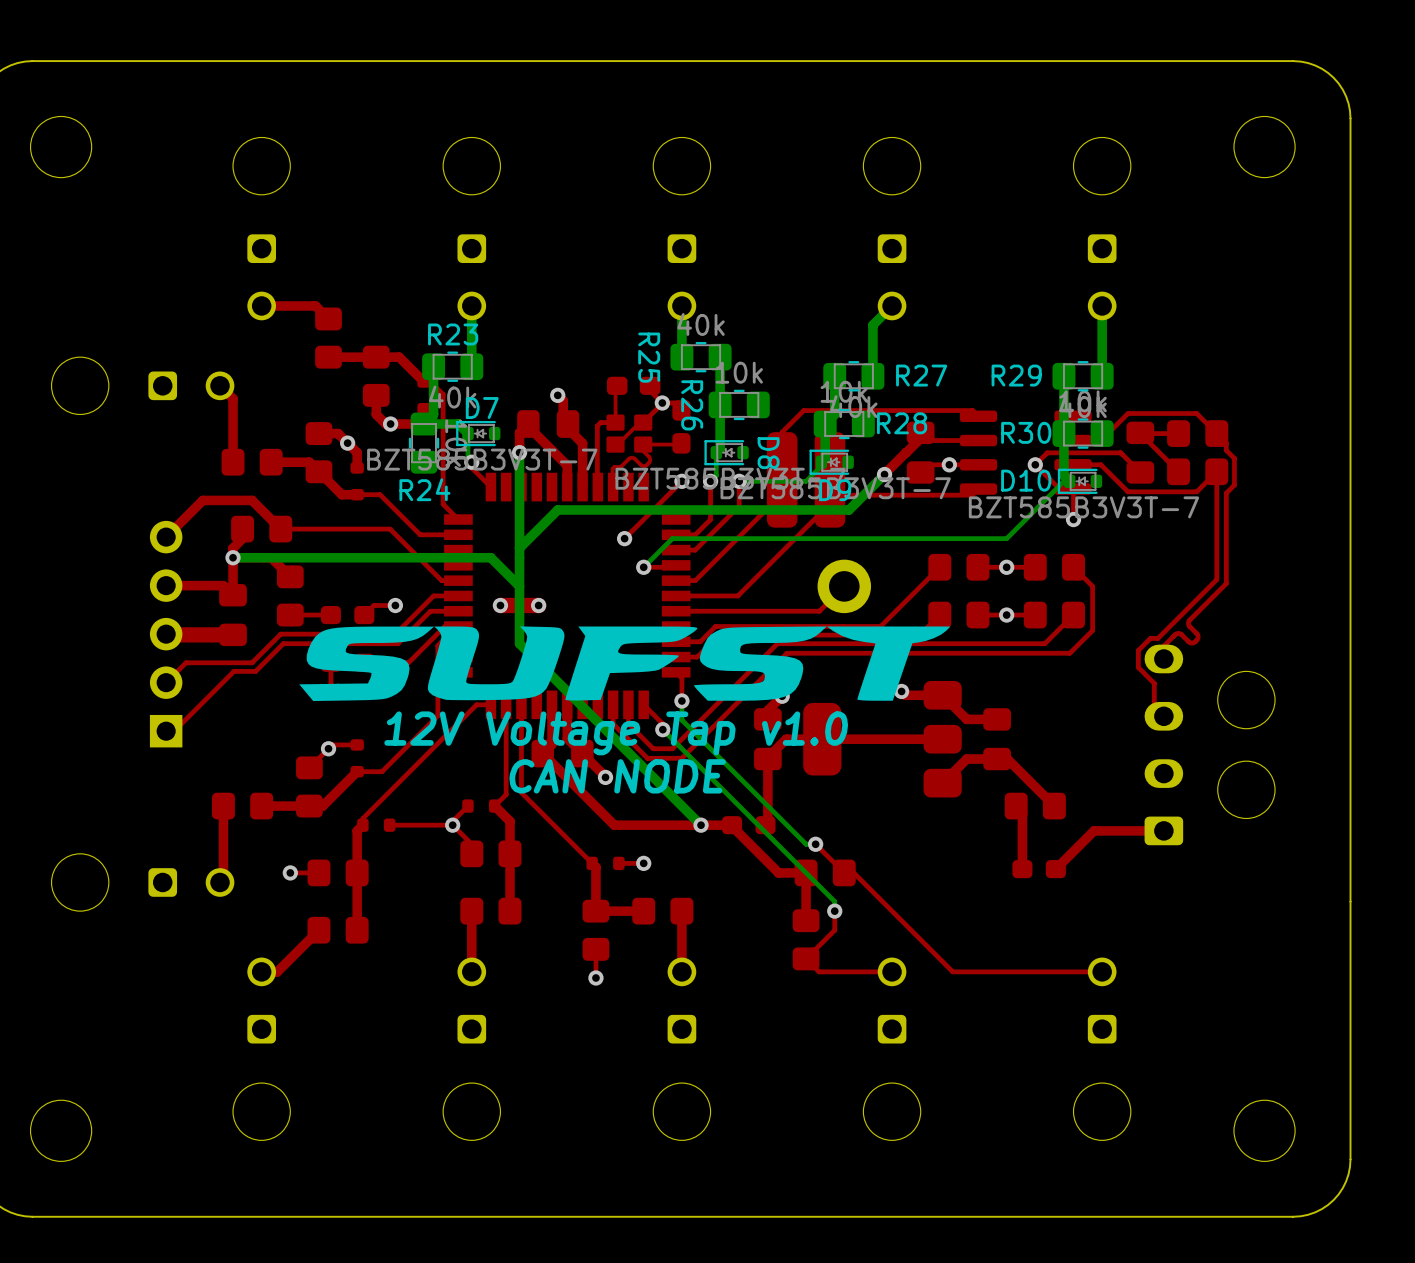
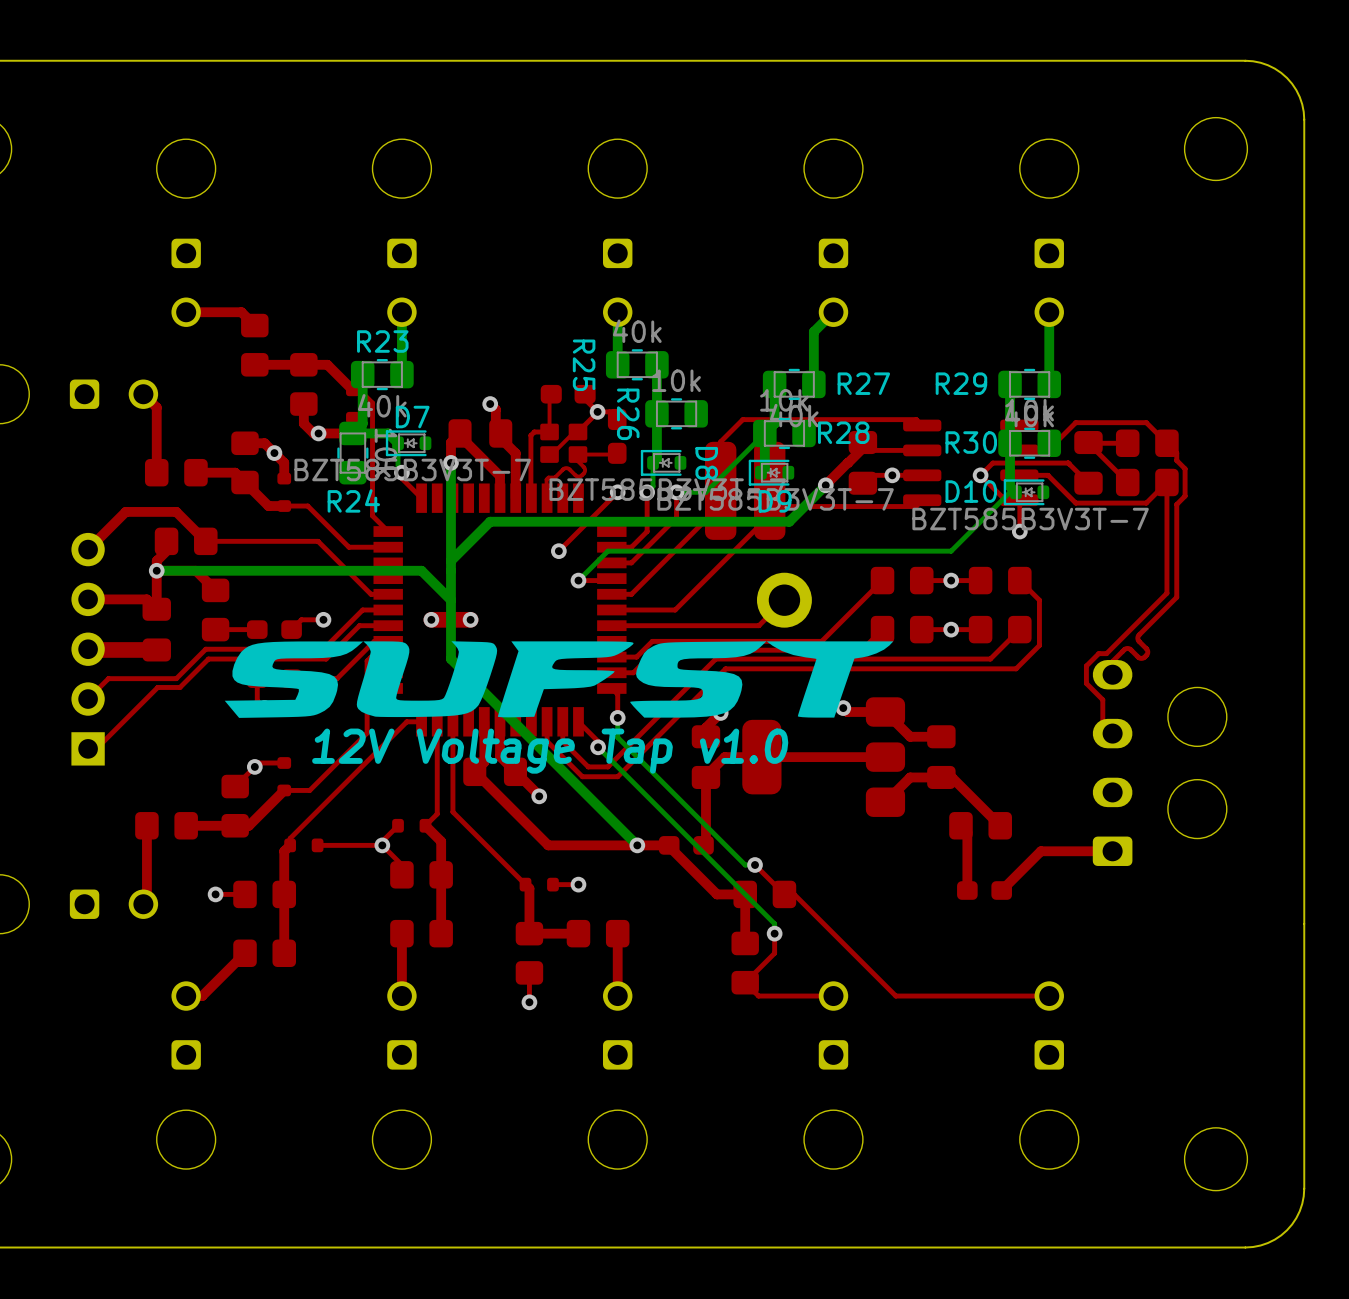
bottom track: (821, 462) (821, 466) (806, 481) (767, 481) -> (764, 433) (705, 492)
text: CAN NODE (617, 776) -> none

